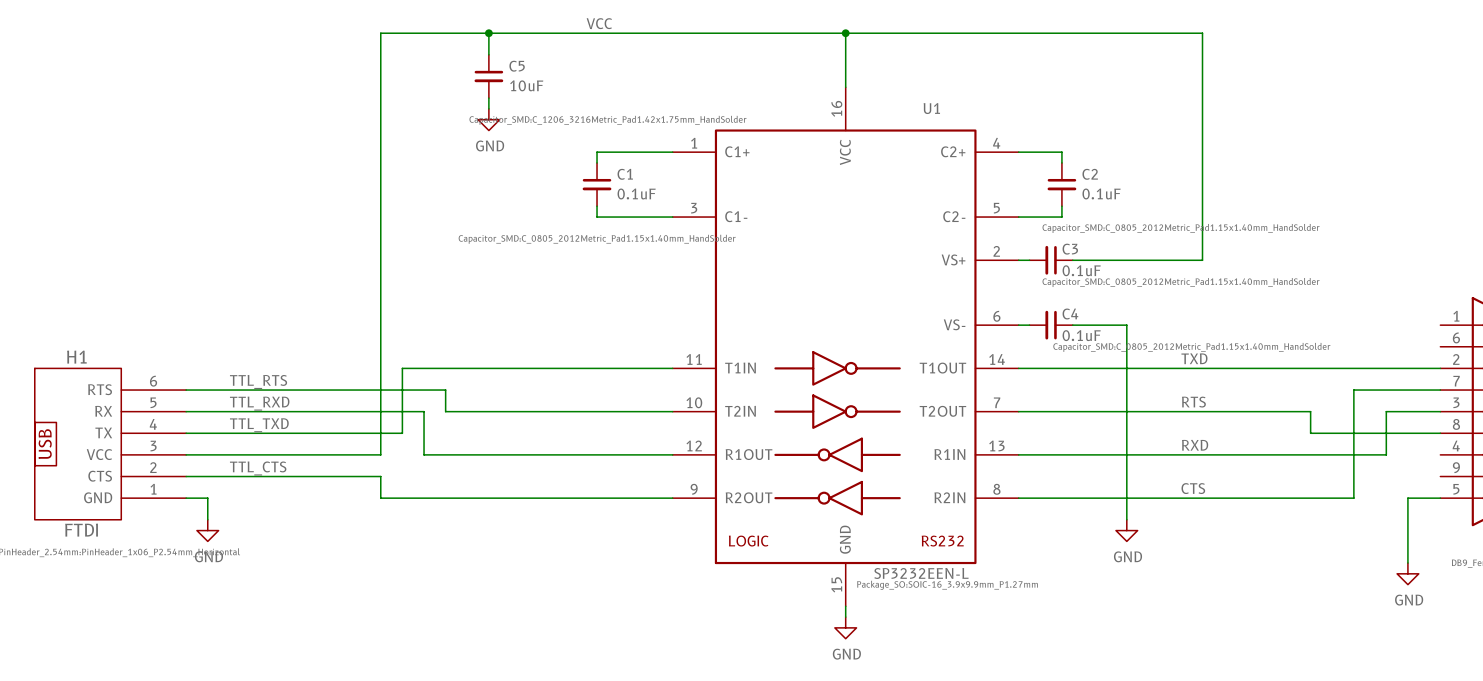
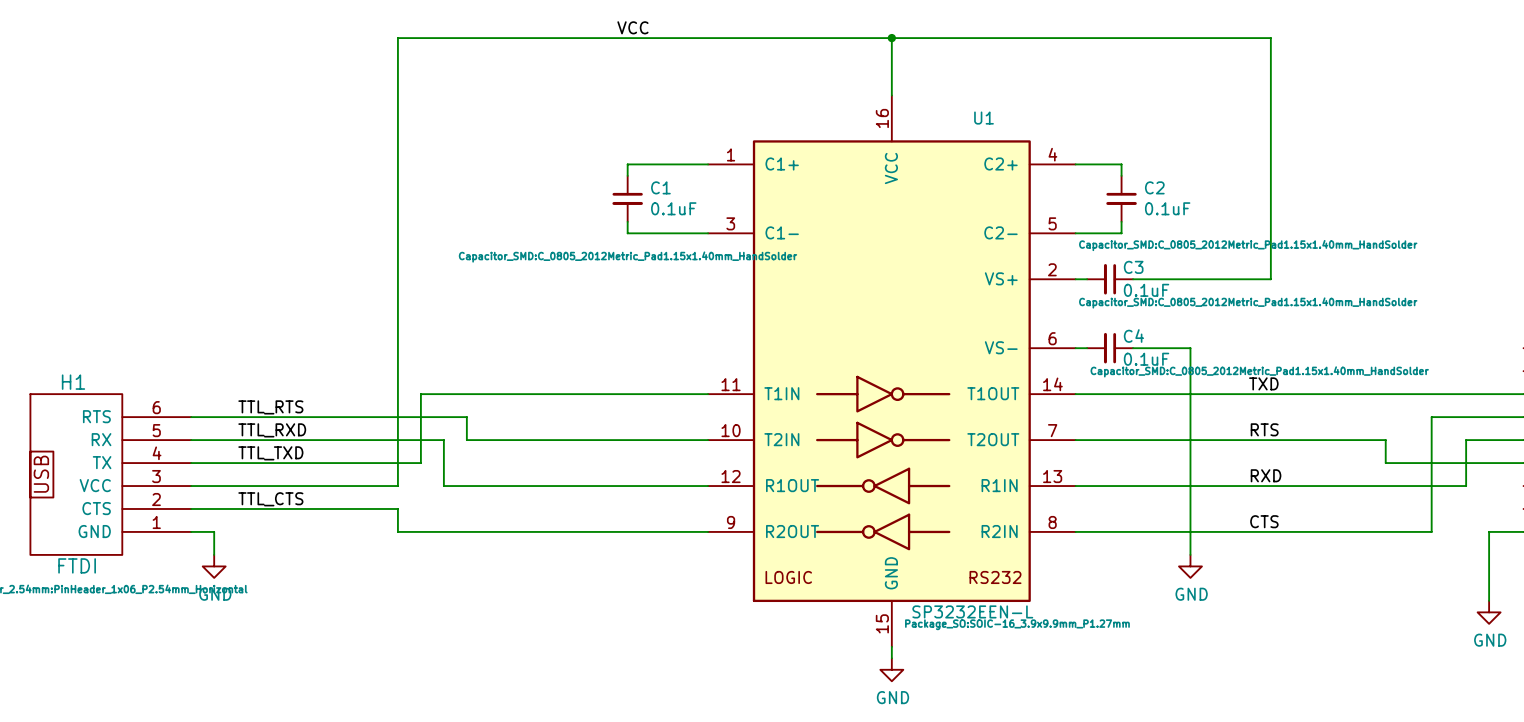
wire: (488, 33) (488, 54) -> none
junction: (488, 33) -> none
C5: 10uF (488, 76) -> none
wire: (488, 98) (488, 108) -> none
power symbol: GND (488, 119) -> none

